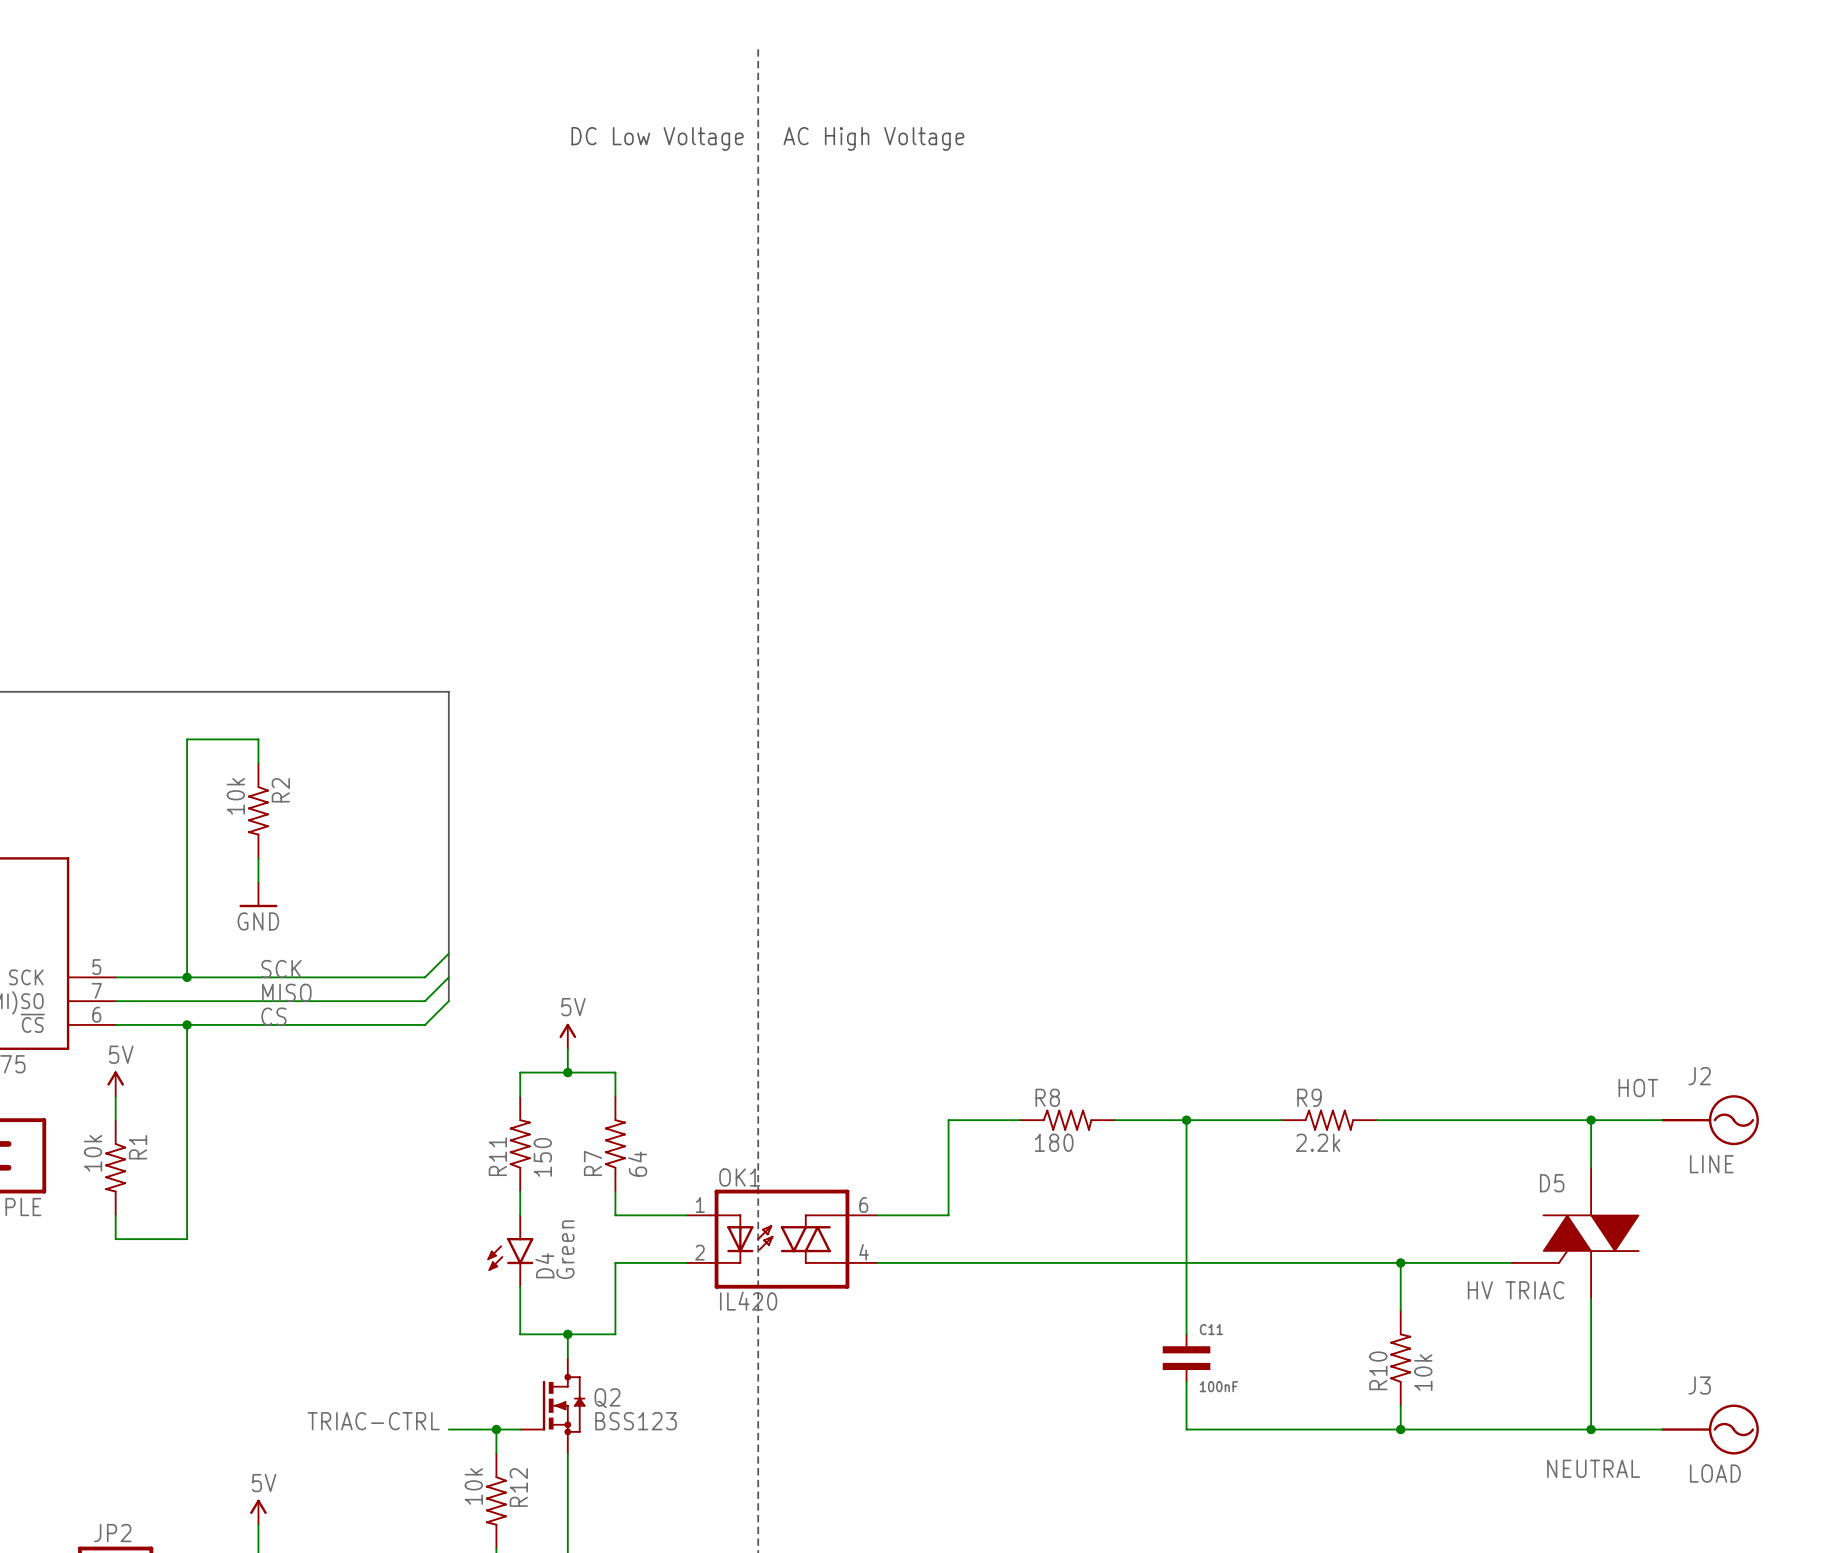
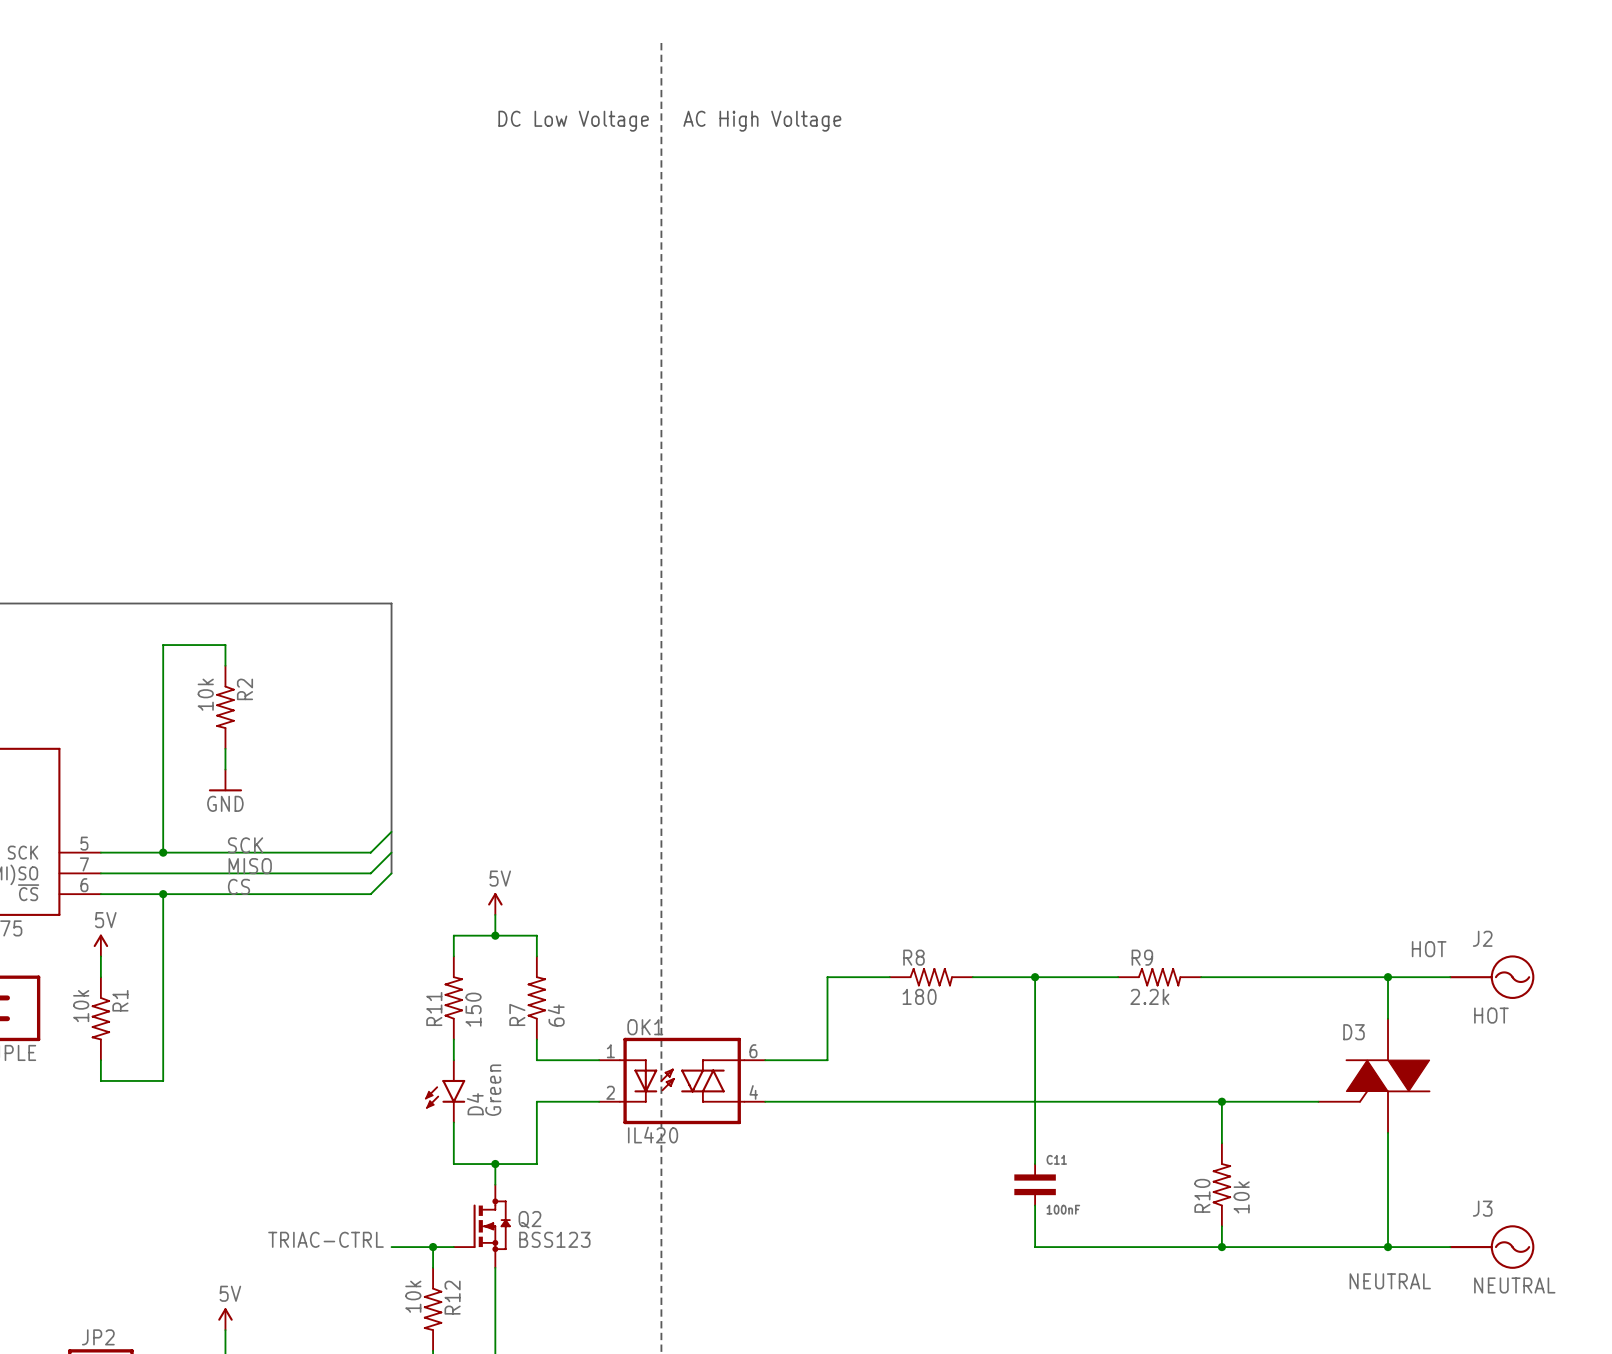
J2 value: LINE (1711, 1164) -> HOT (1491, 1015)
D5 name: D5 (1552, 1183) -> D3 (1354, 1032)
D5 value: HV TRIAC (1516, 1290) -> none
J3 value: LOAD (1715, 1473) -> NEUTRAL (1514, 1285)

